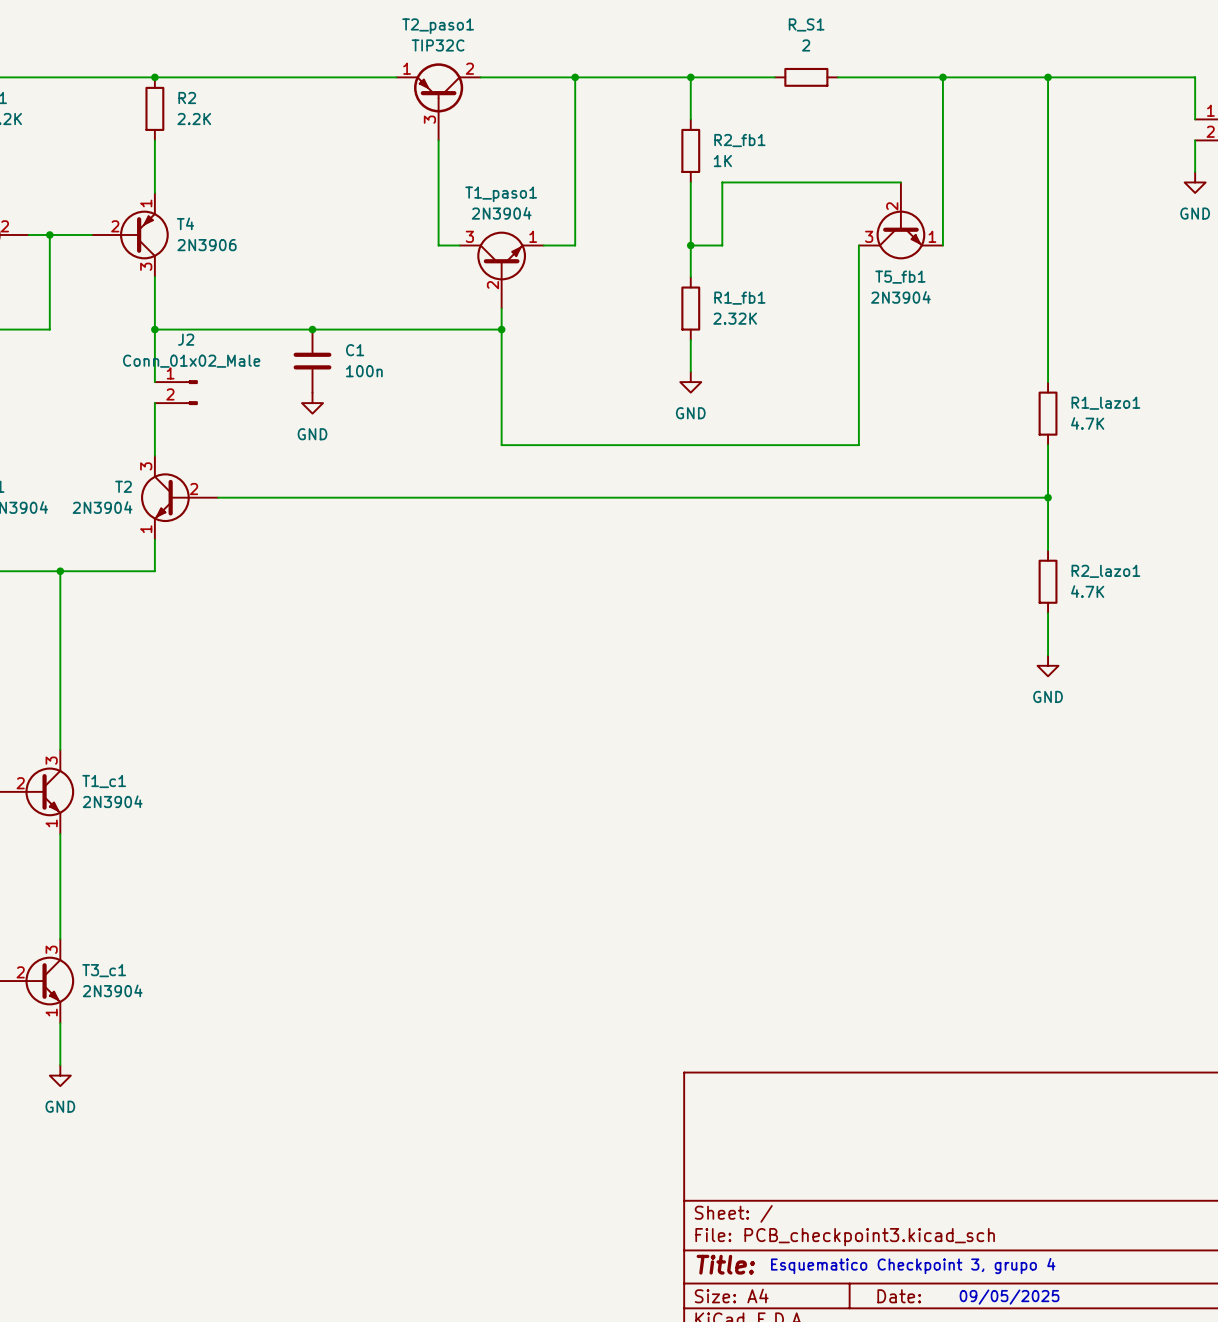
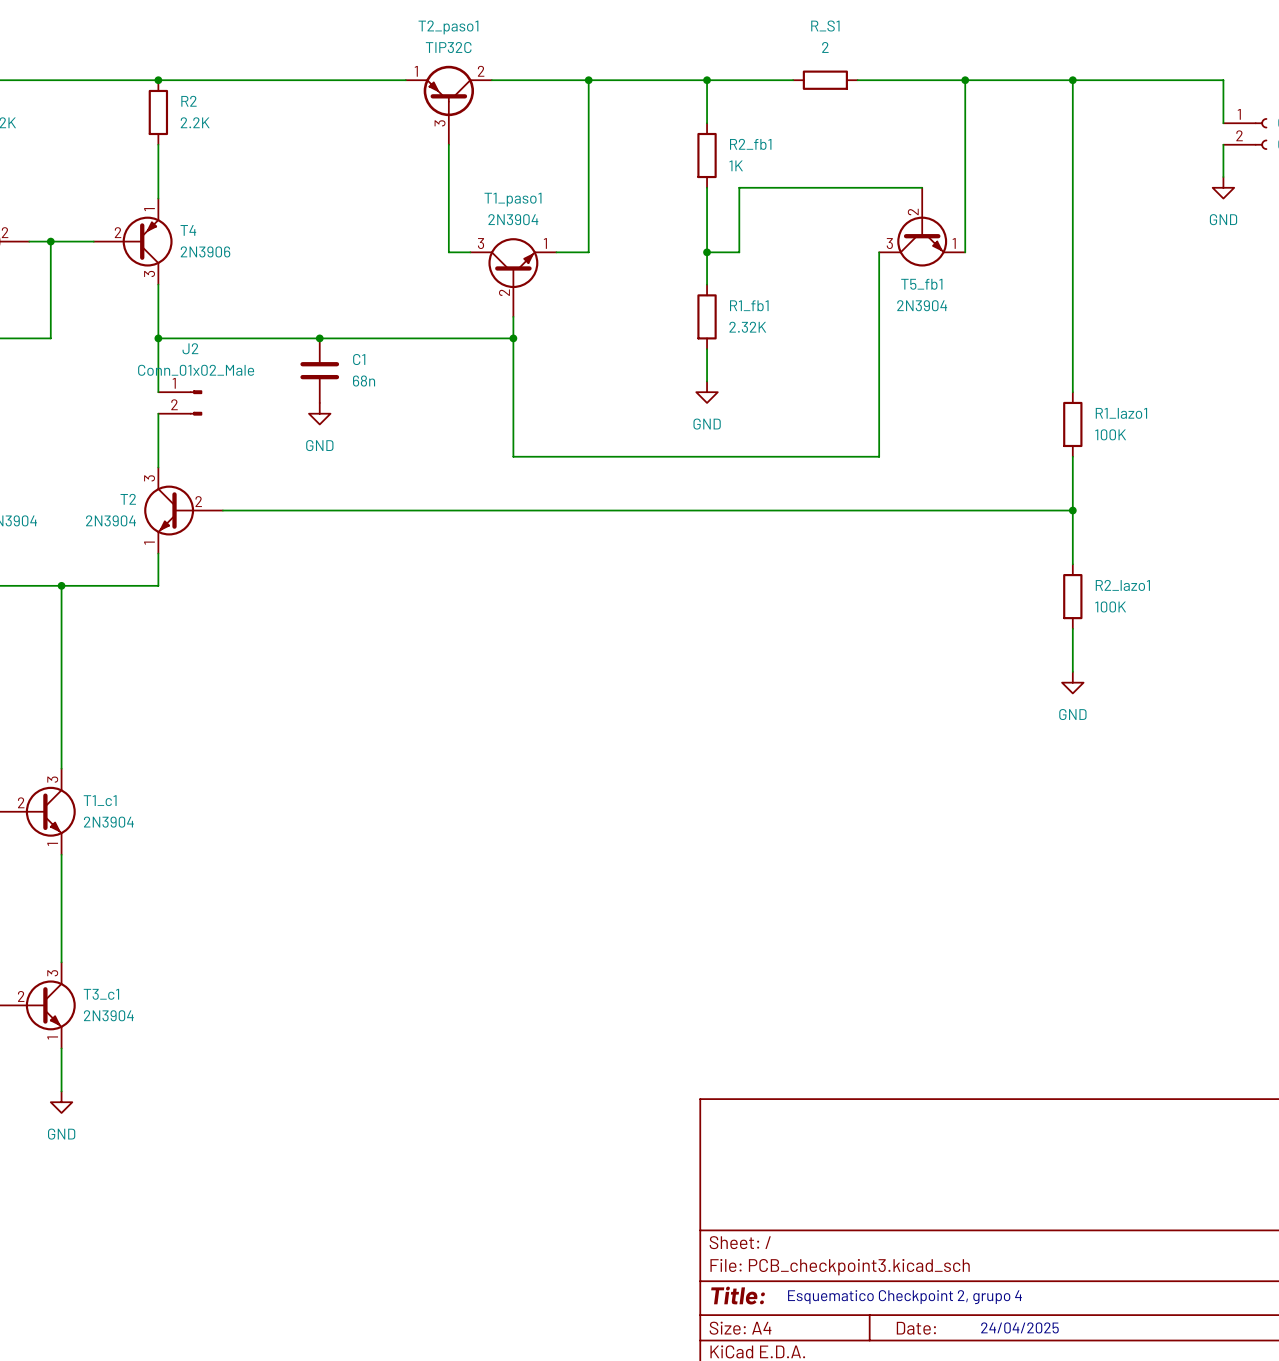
C1 value: 100n (364, 371) -> 68n (364, 381)
R1_lazo1 value: 4.7K (1087, 423) -> 100K (1110, 434)
R2_lazo1 value: 4.7K (1087, 591) -> 100K (1110, 606)
text: Esquematico Checkpoint 3, grupo 4 (913, 1266) -> Esquematico Checkpoint 2, grupo 4 (904, 1297)
text: 09/05/2025 (1009, 1297) -> 24/04/2025 (1019, 1327)

